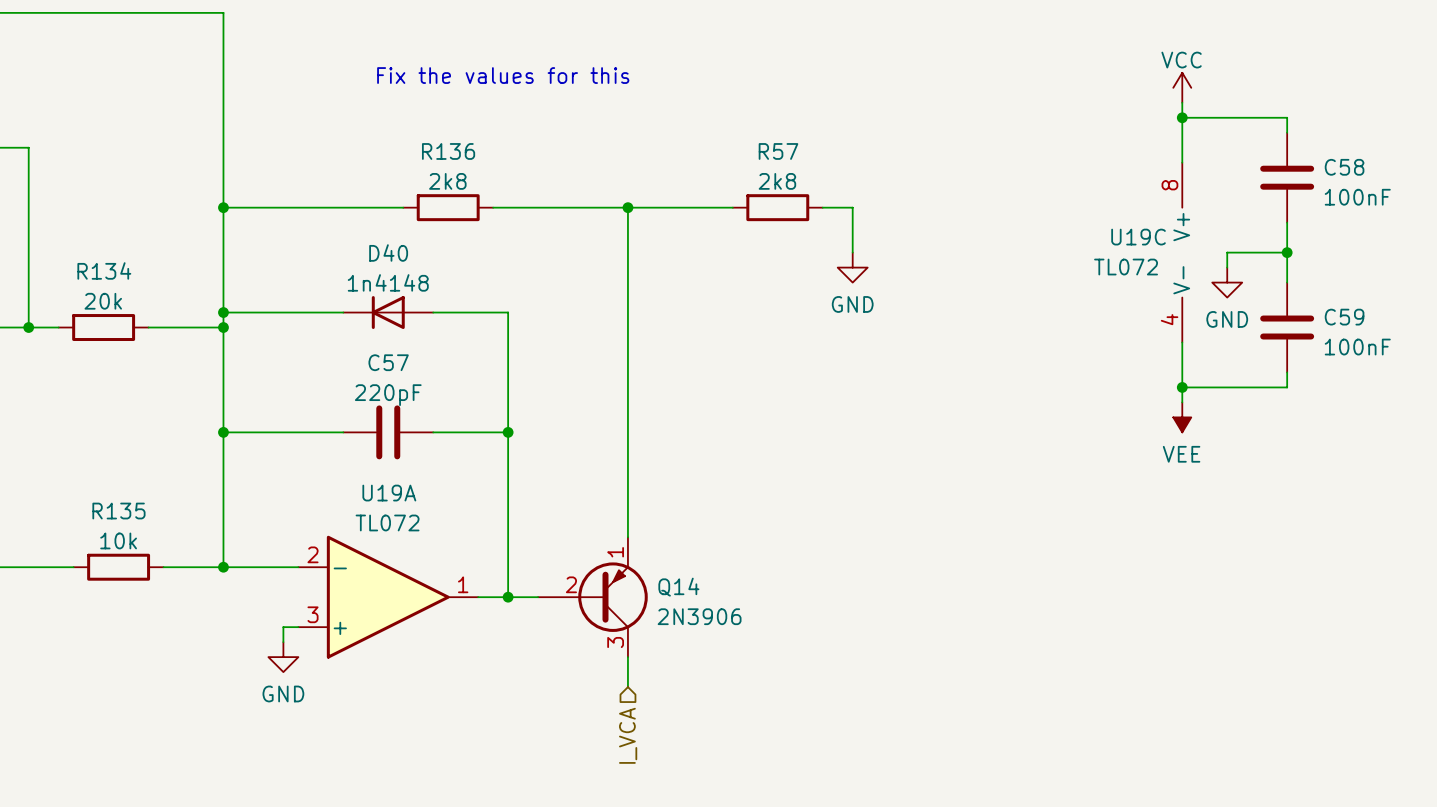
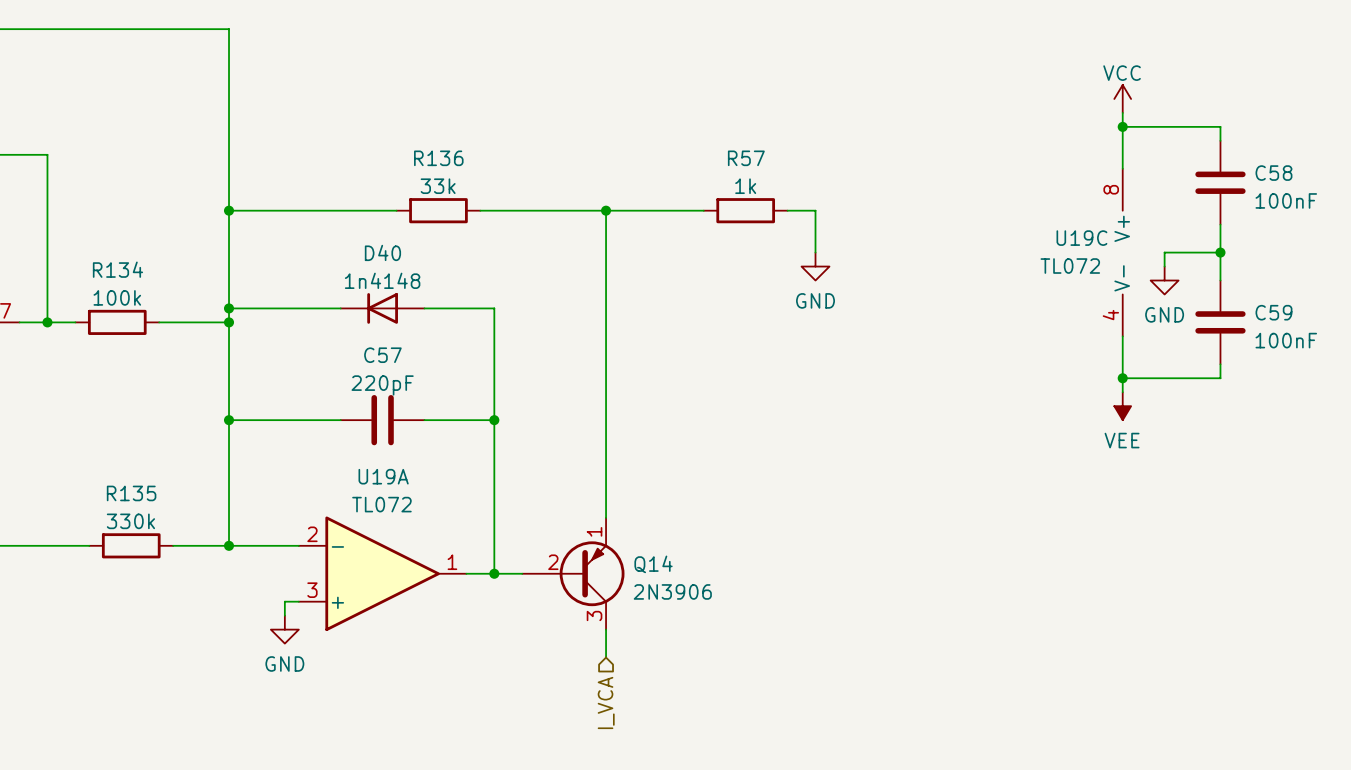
text: Fix the values for this (503, 75) -> none
R136 value: 2k8 (447, 181) -> 33k (438, 186)
R57 value: 2k8 (777, 181) -> 1k (745, 186)
R134 value: 20k (103, 301) -> 100k (117, 297)
R135 value: 10k (118, 540) -> 330k (130, 521)

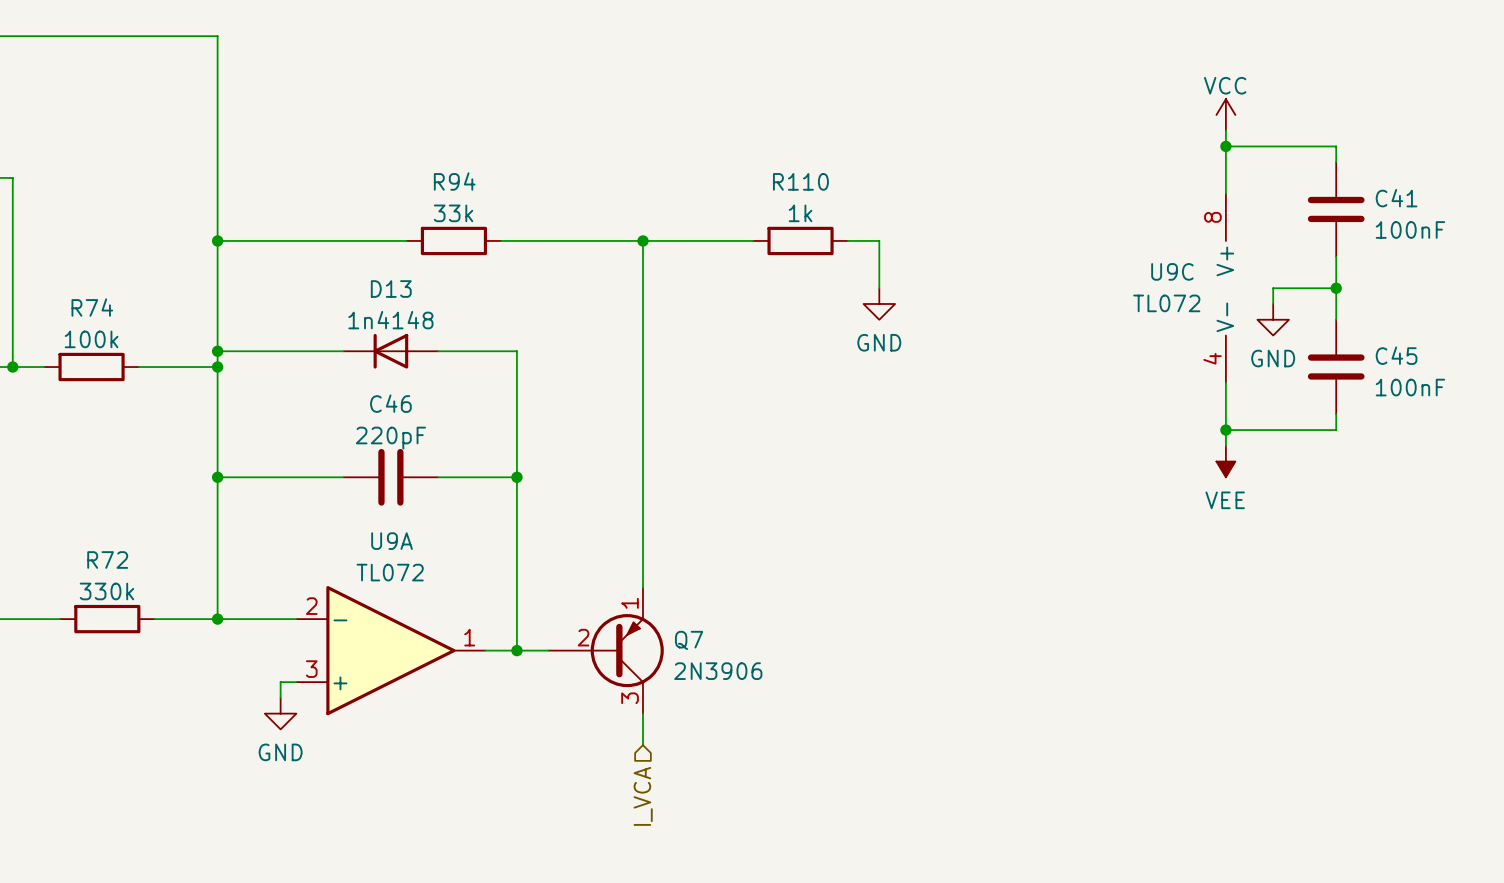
R136 name: R136 (438, 158) -> R94 (454, 181)
R57 name: R57 (746, 158) -> R110 (800, 181)
C58 name: C58 (1273, 173) -> C41 (1396, 198)
U19C name: U19C (1081, 238) -> U9C (1172, 271)
D40 name: D40 (382, 252) -> D13 (391, 289)
R134 name: R134 (117, 269) -> R74 (92, 307)
C59 name: C59 (1273, 312) -> C45 (1396, 355)
C57 name: C57 (382, 355) -> C46 (390, 403)
U19A name: U19A (383, 476) -> U9A (392, 541)
R135 name: R135 (131, 493) -> R72 (107, 560)
Q14 name: Q14 (653, 564) -> Q7 (689, 640)

